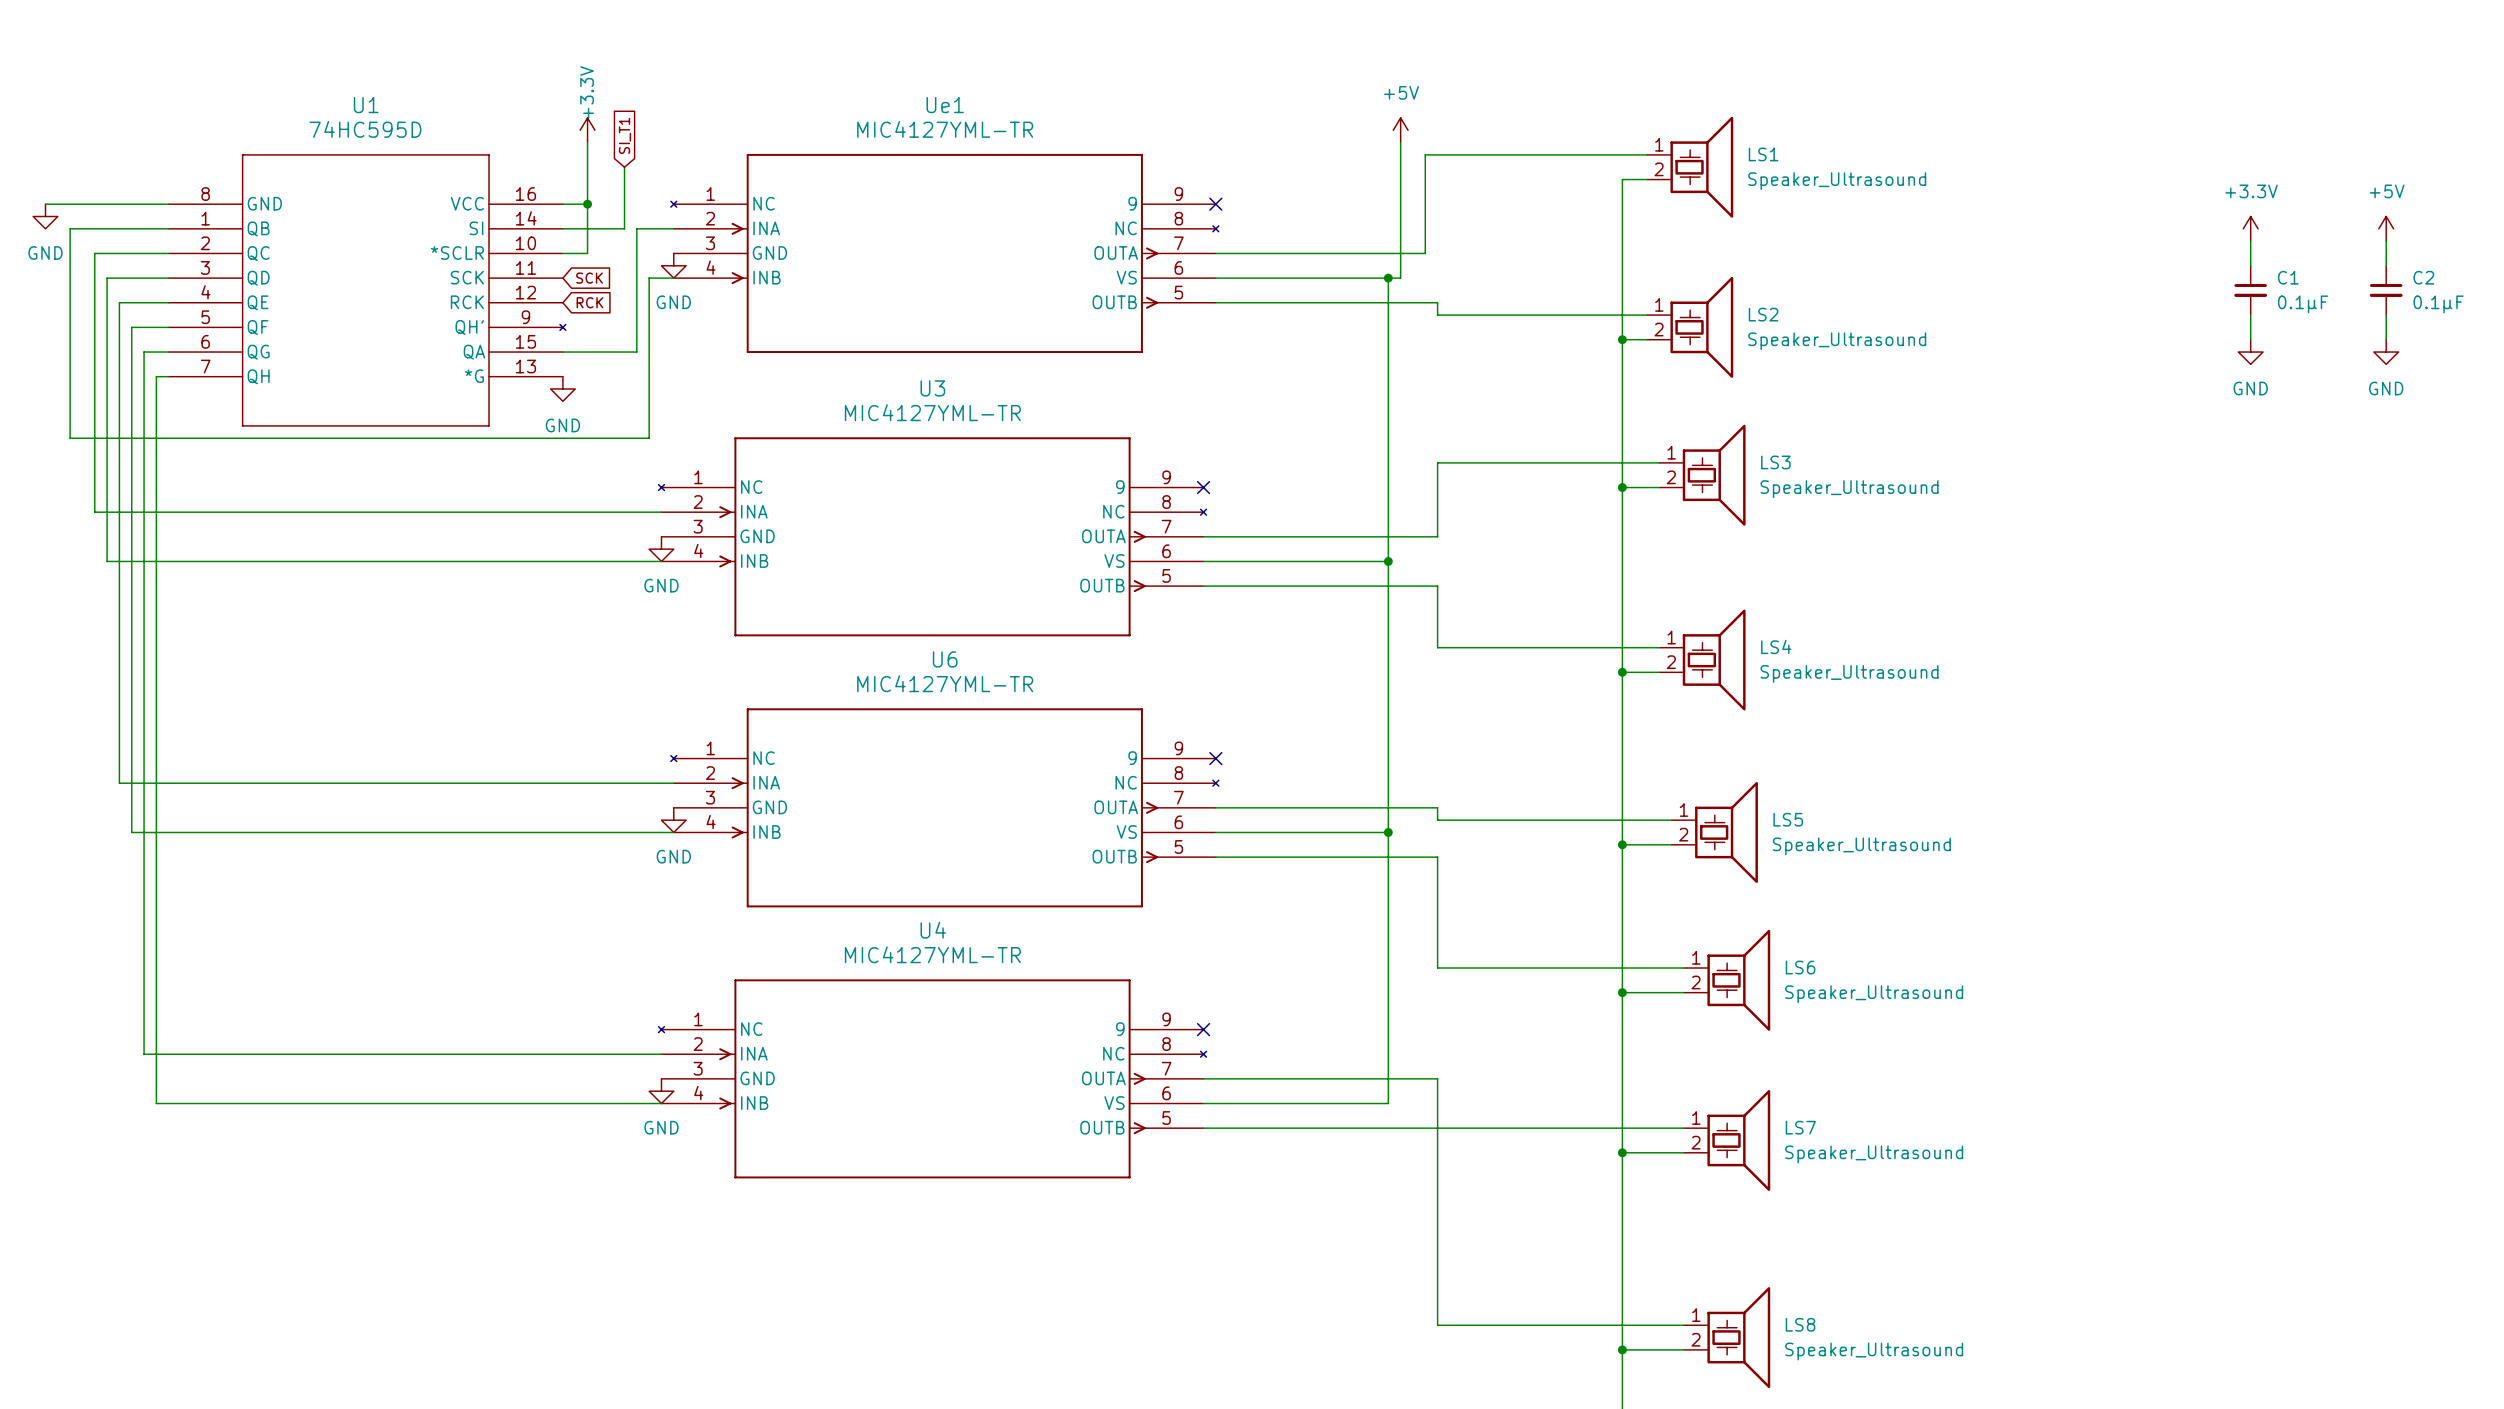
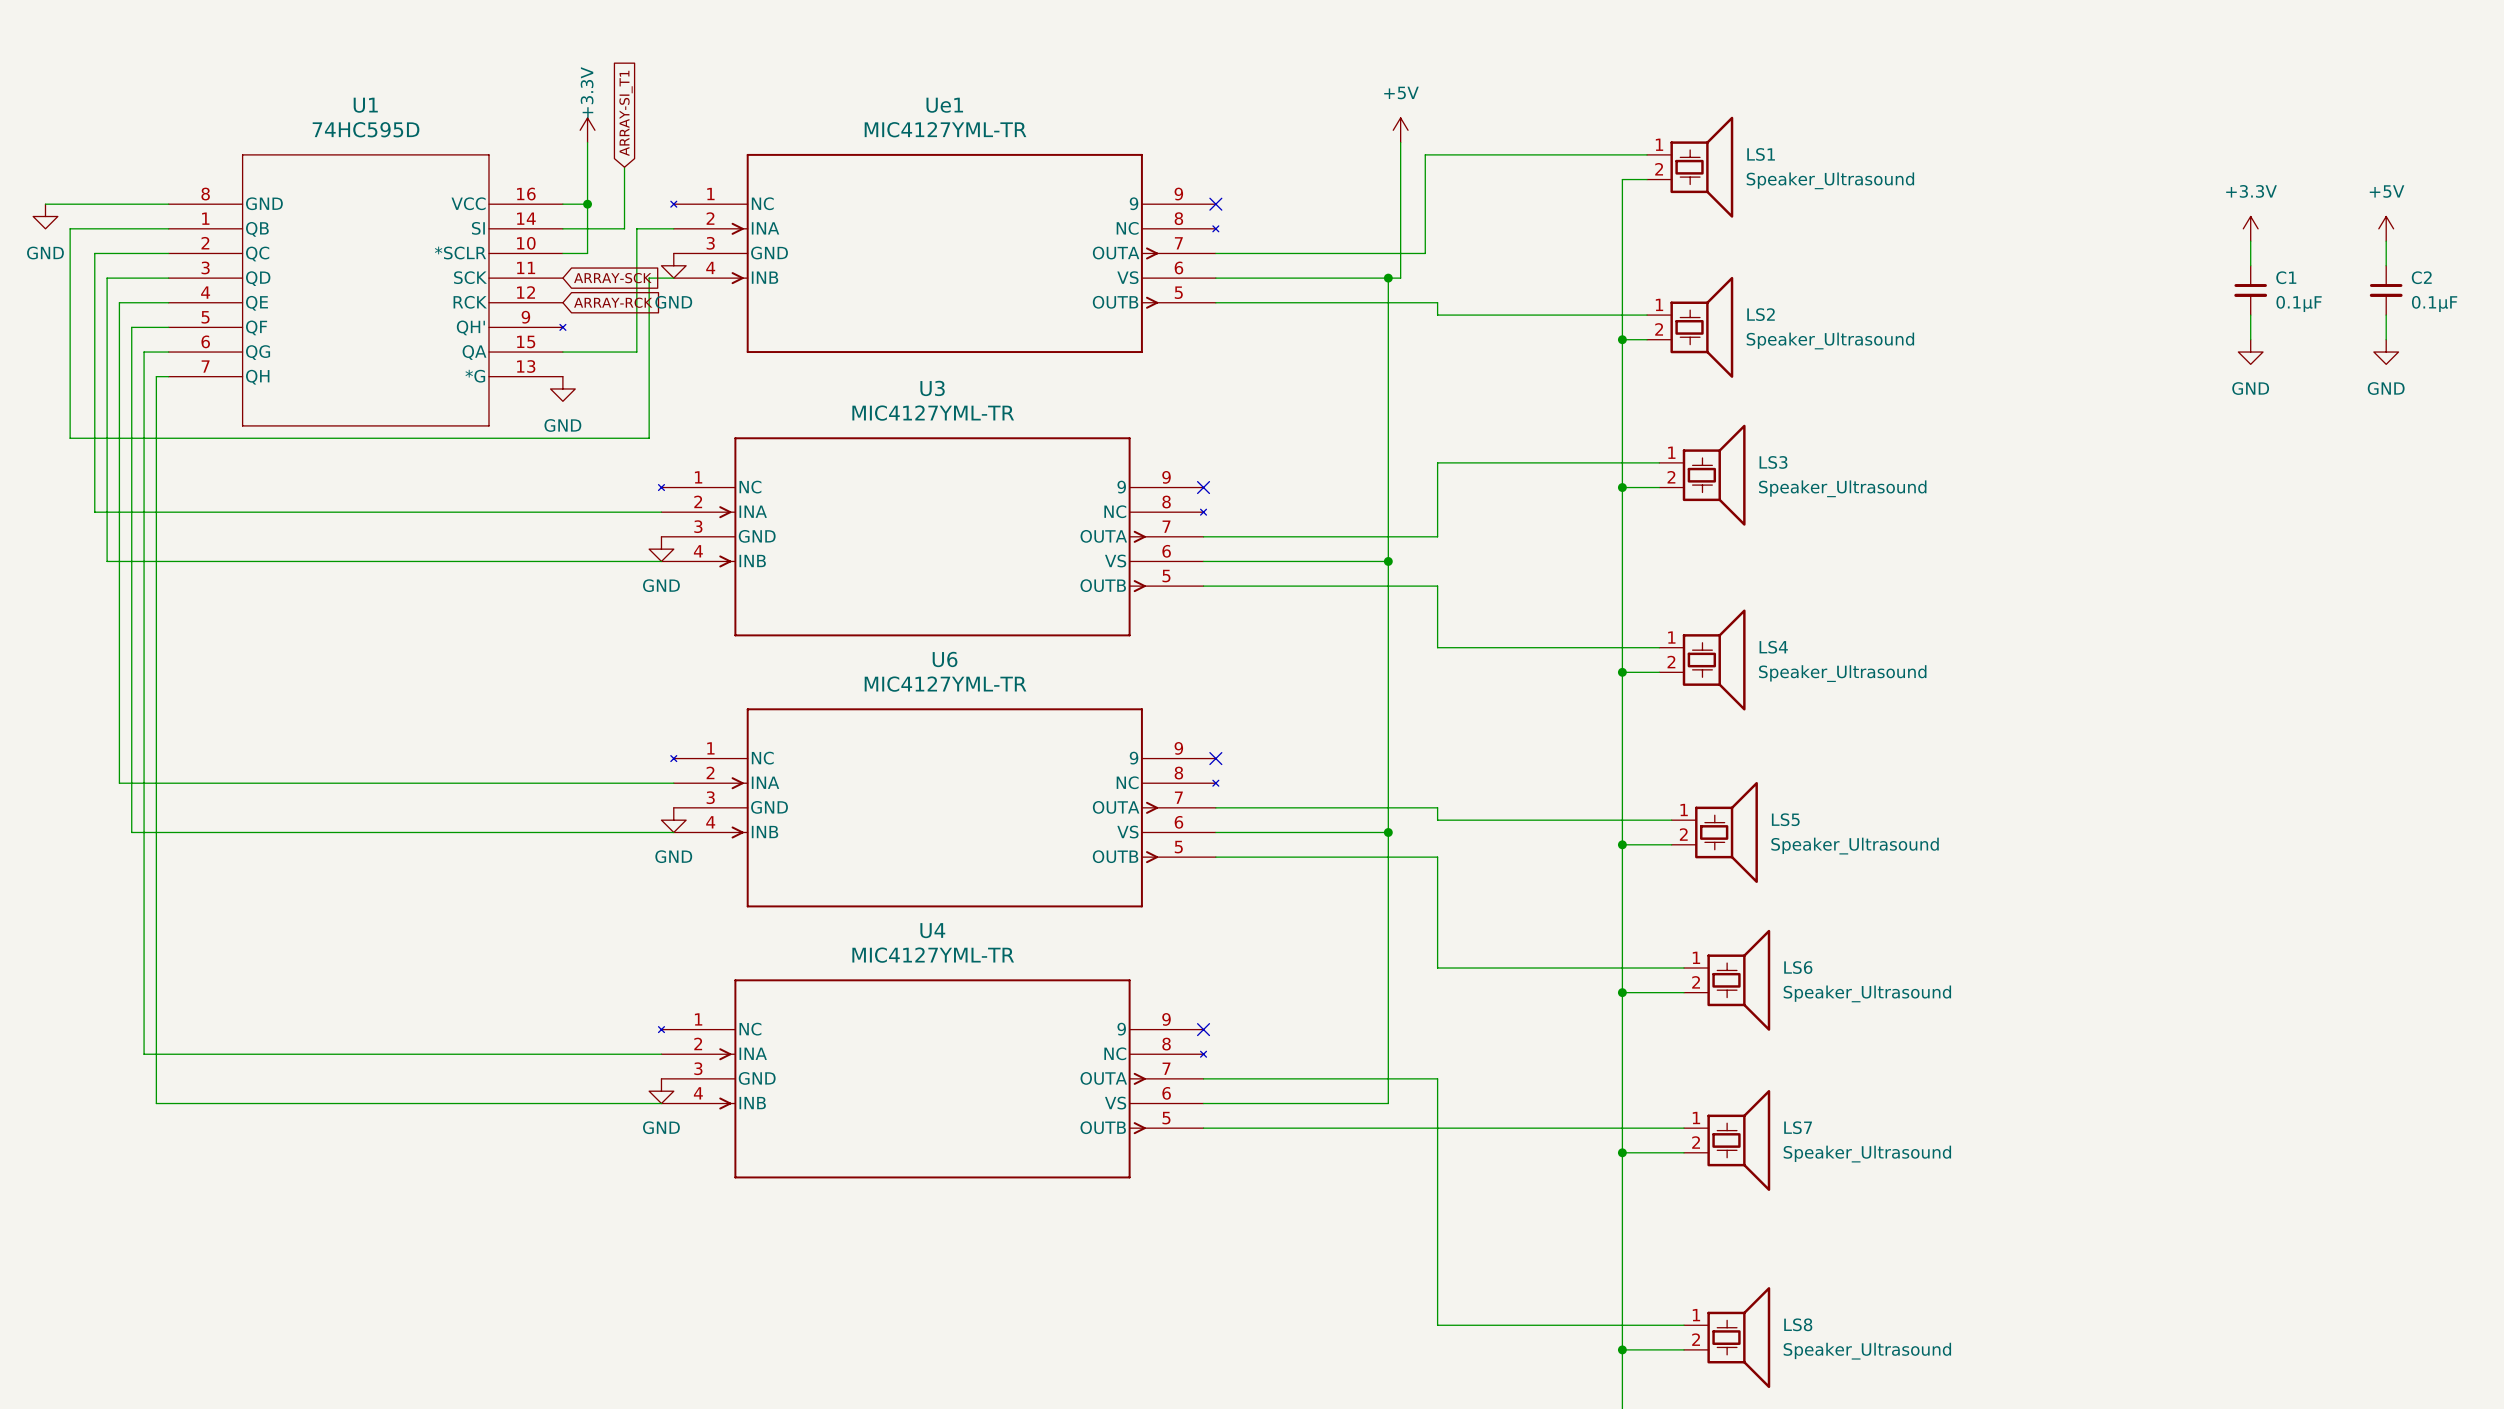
global label: SI_T1 (624, 135) -> ARRAY-SI_T1 (626, 113)
global label: SCK (589, 278) -> ARRAY-SCK (612, 278)
global label: RCK (589, 302) -> ARRAY-RCK (613, 302)

